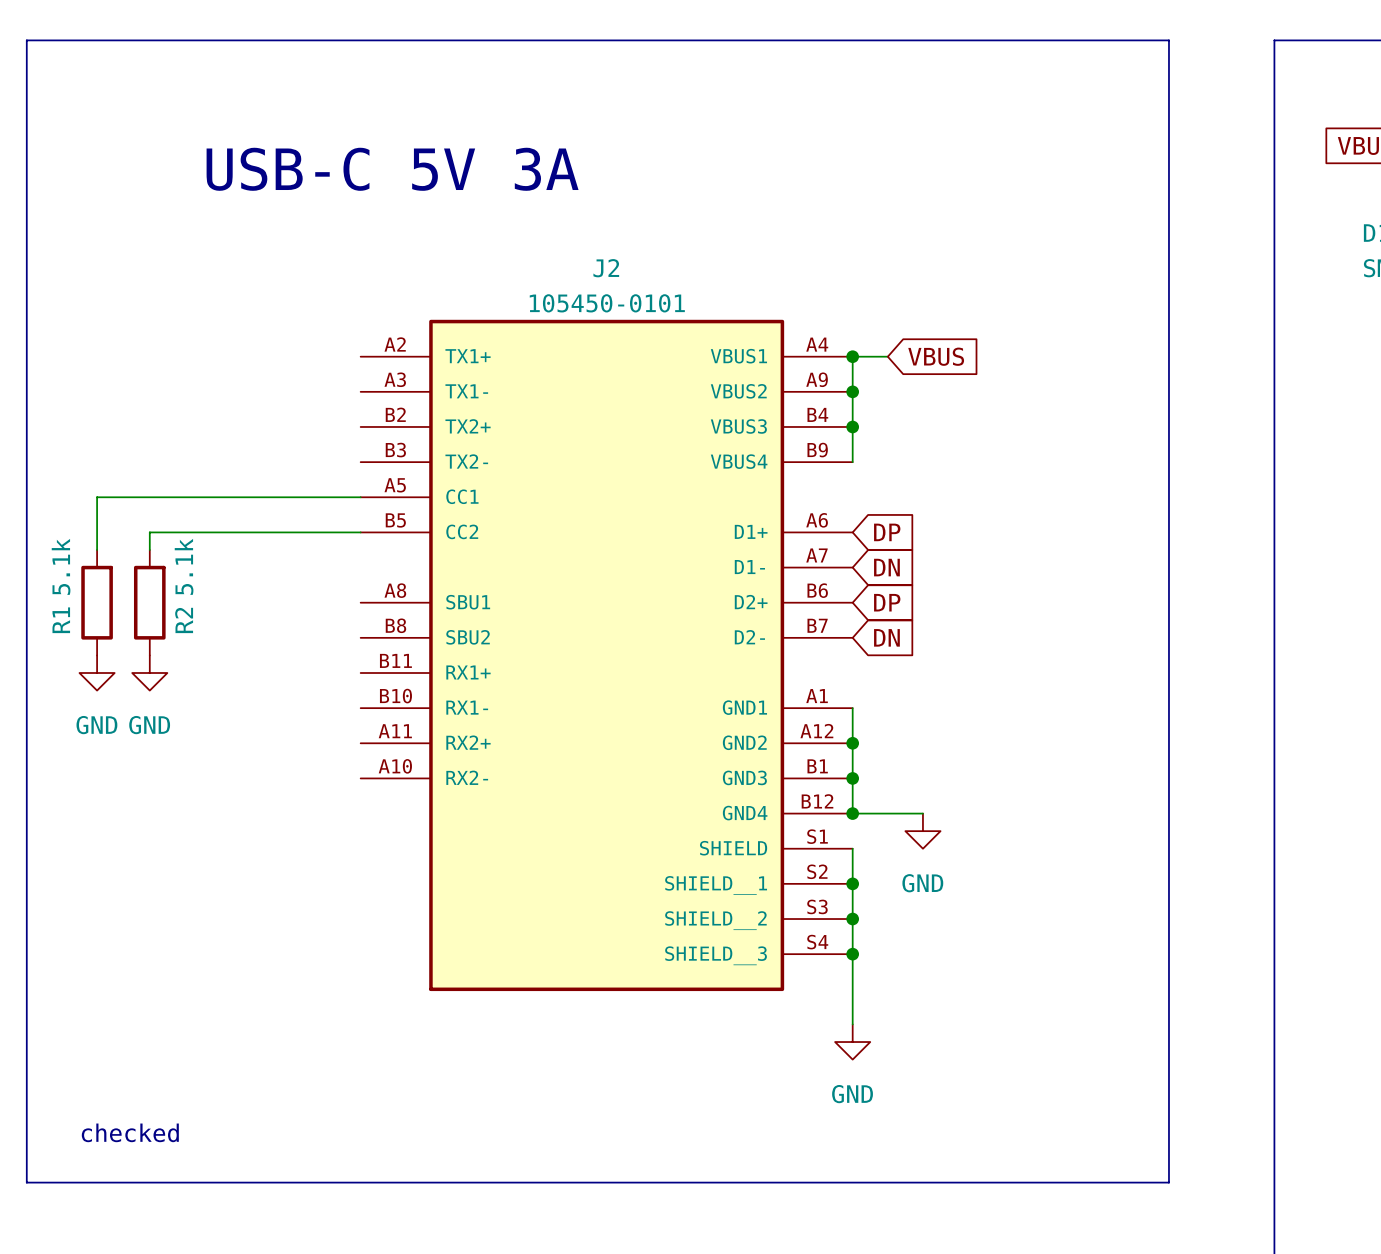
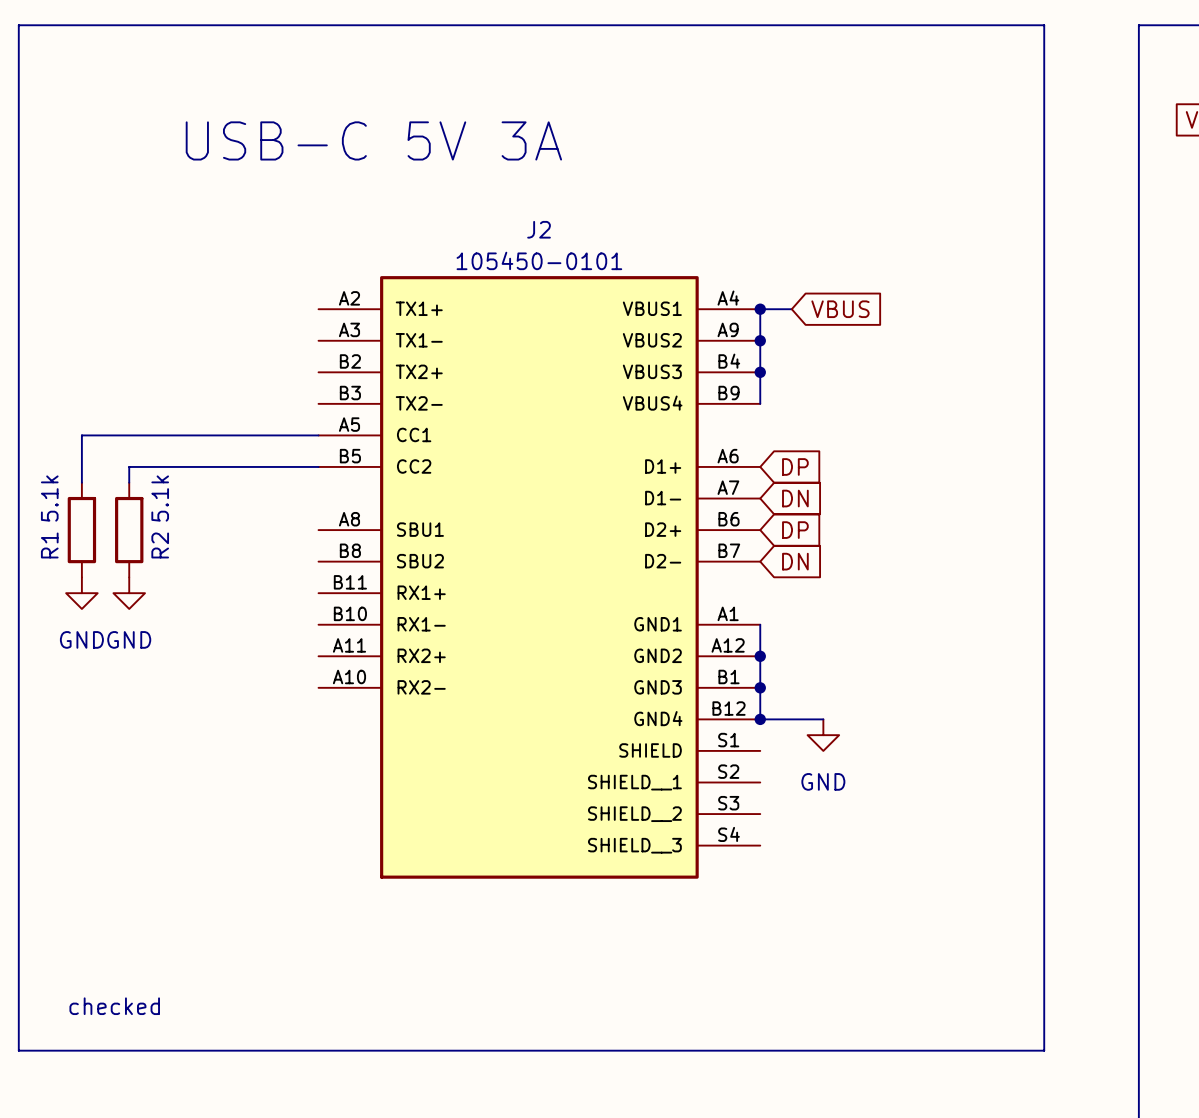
wire: (852, 848) (852, 1024) -> none
junction: (852, 883) -> none
junction: (852, 919) -> none
junction: (852, 954) -> none
power symbol: GND (852, 1042) -> none

